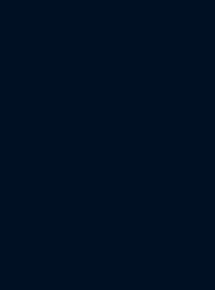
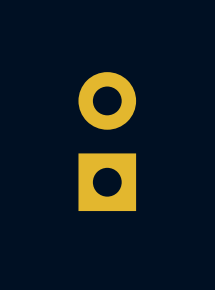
part: none -> (107, 141)

